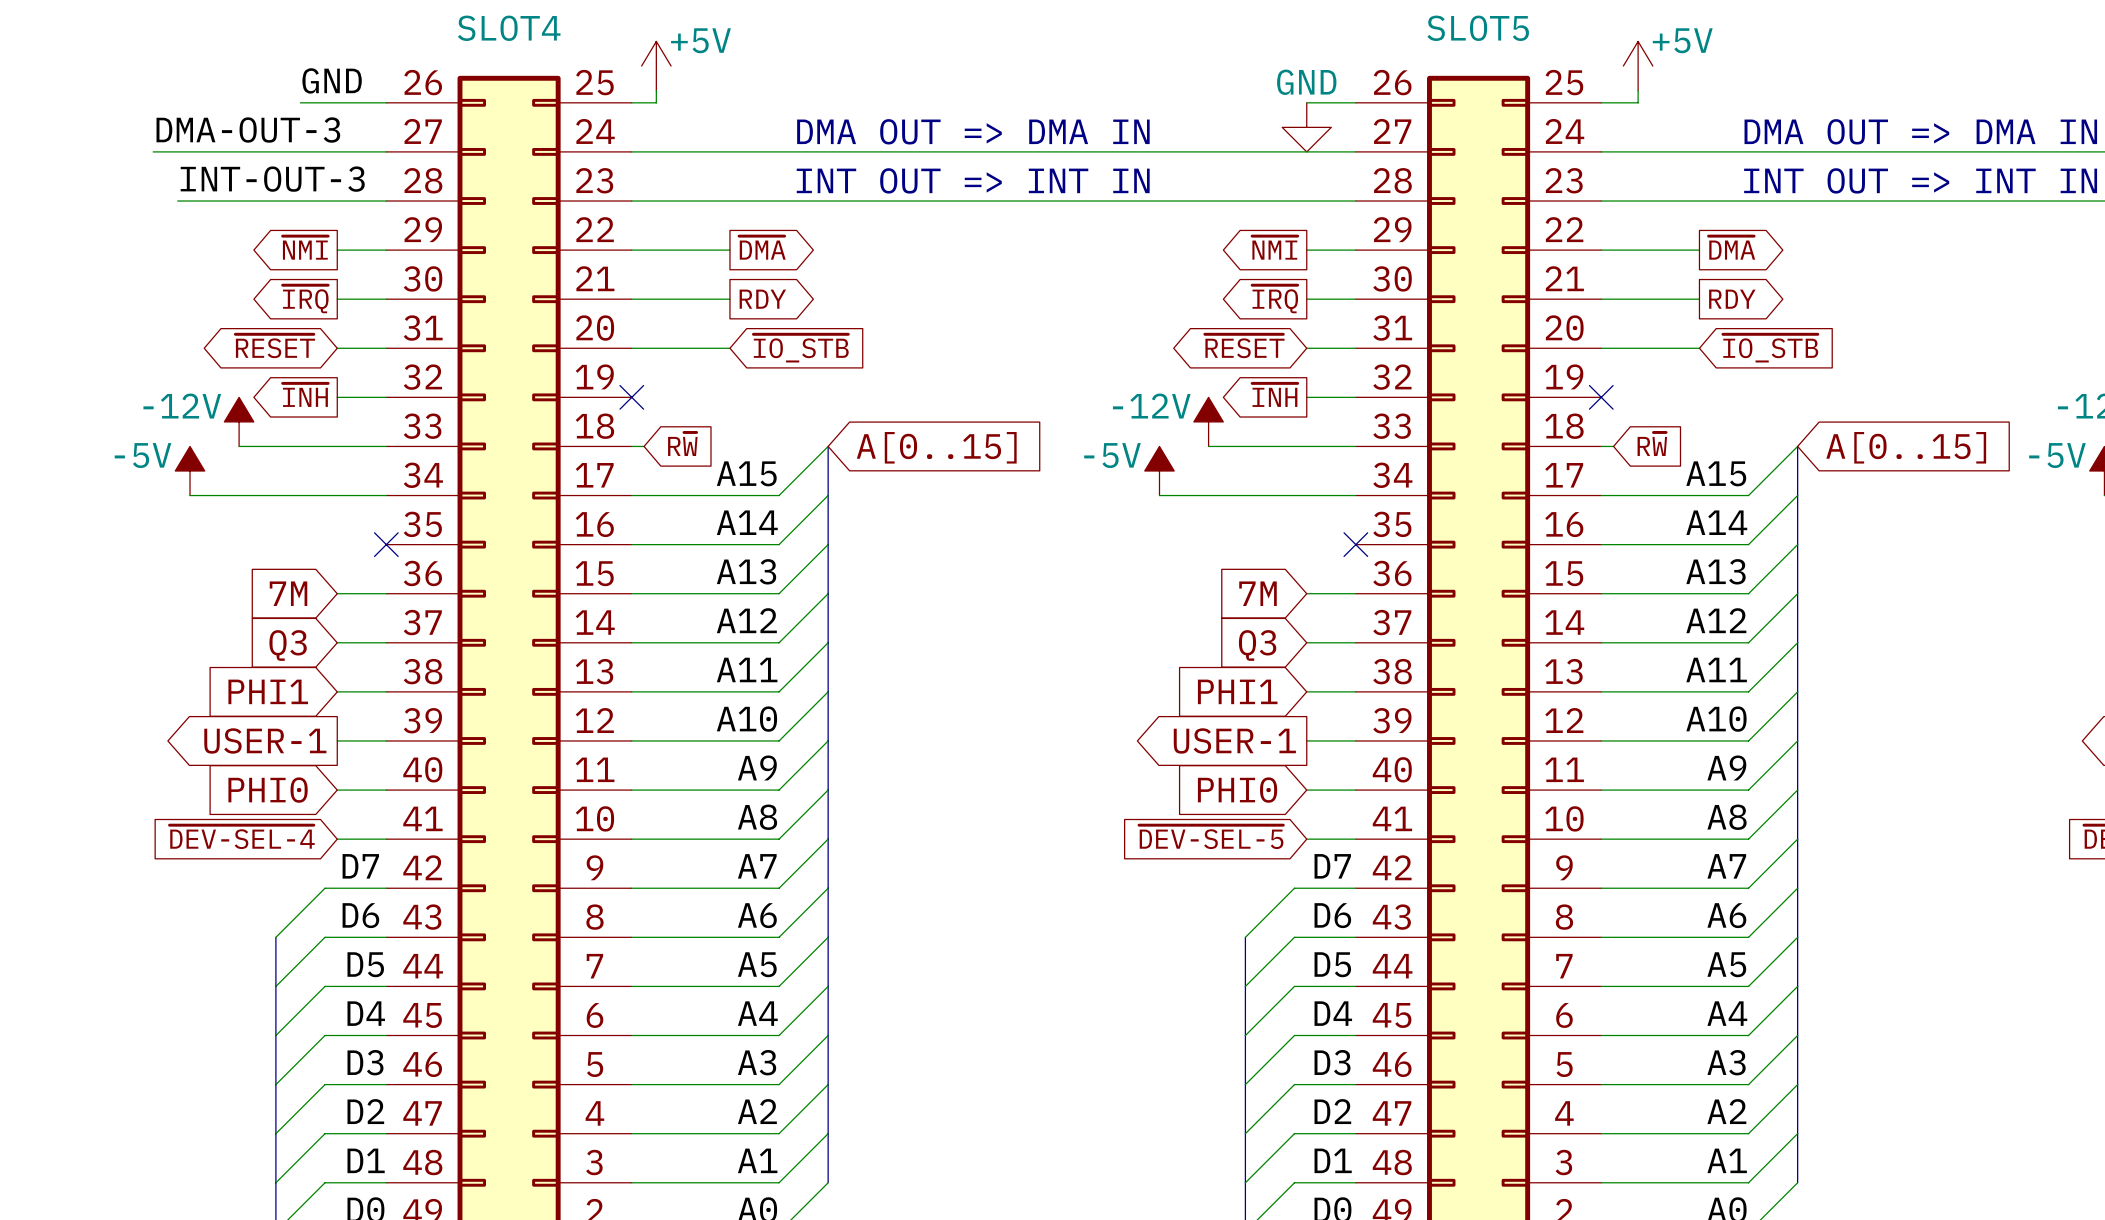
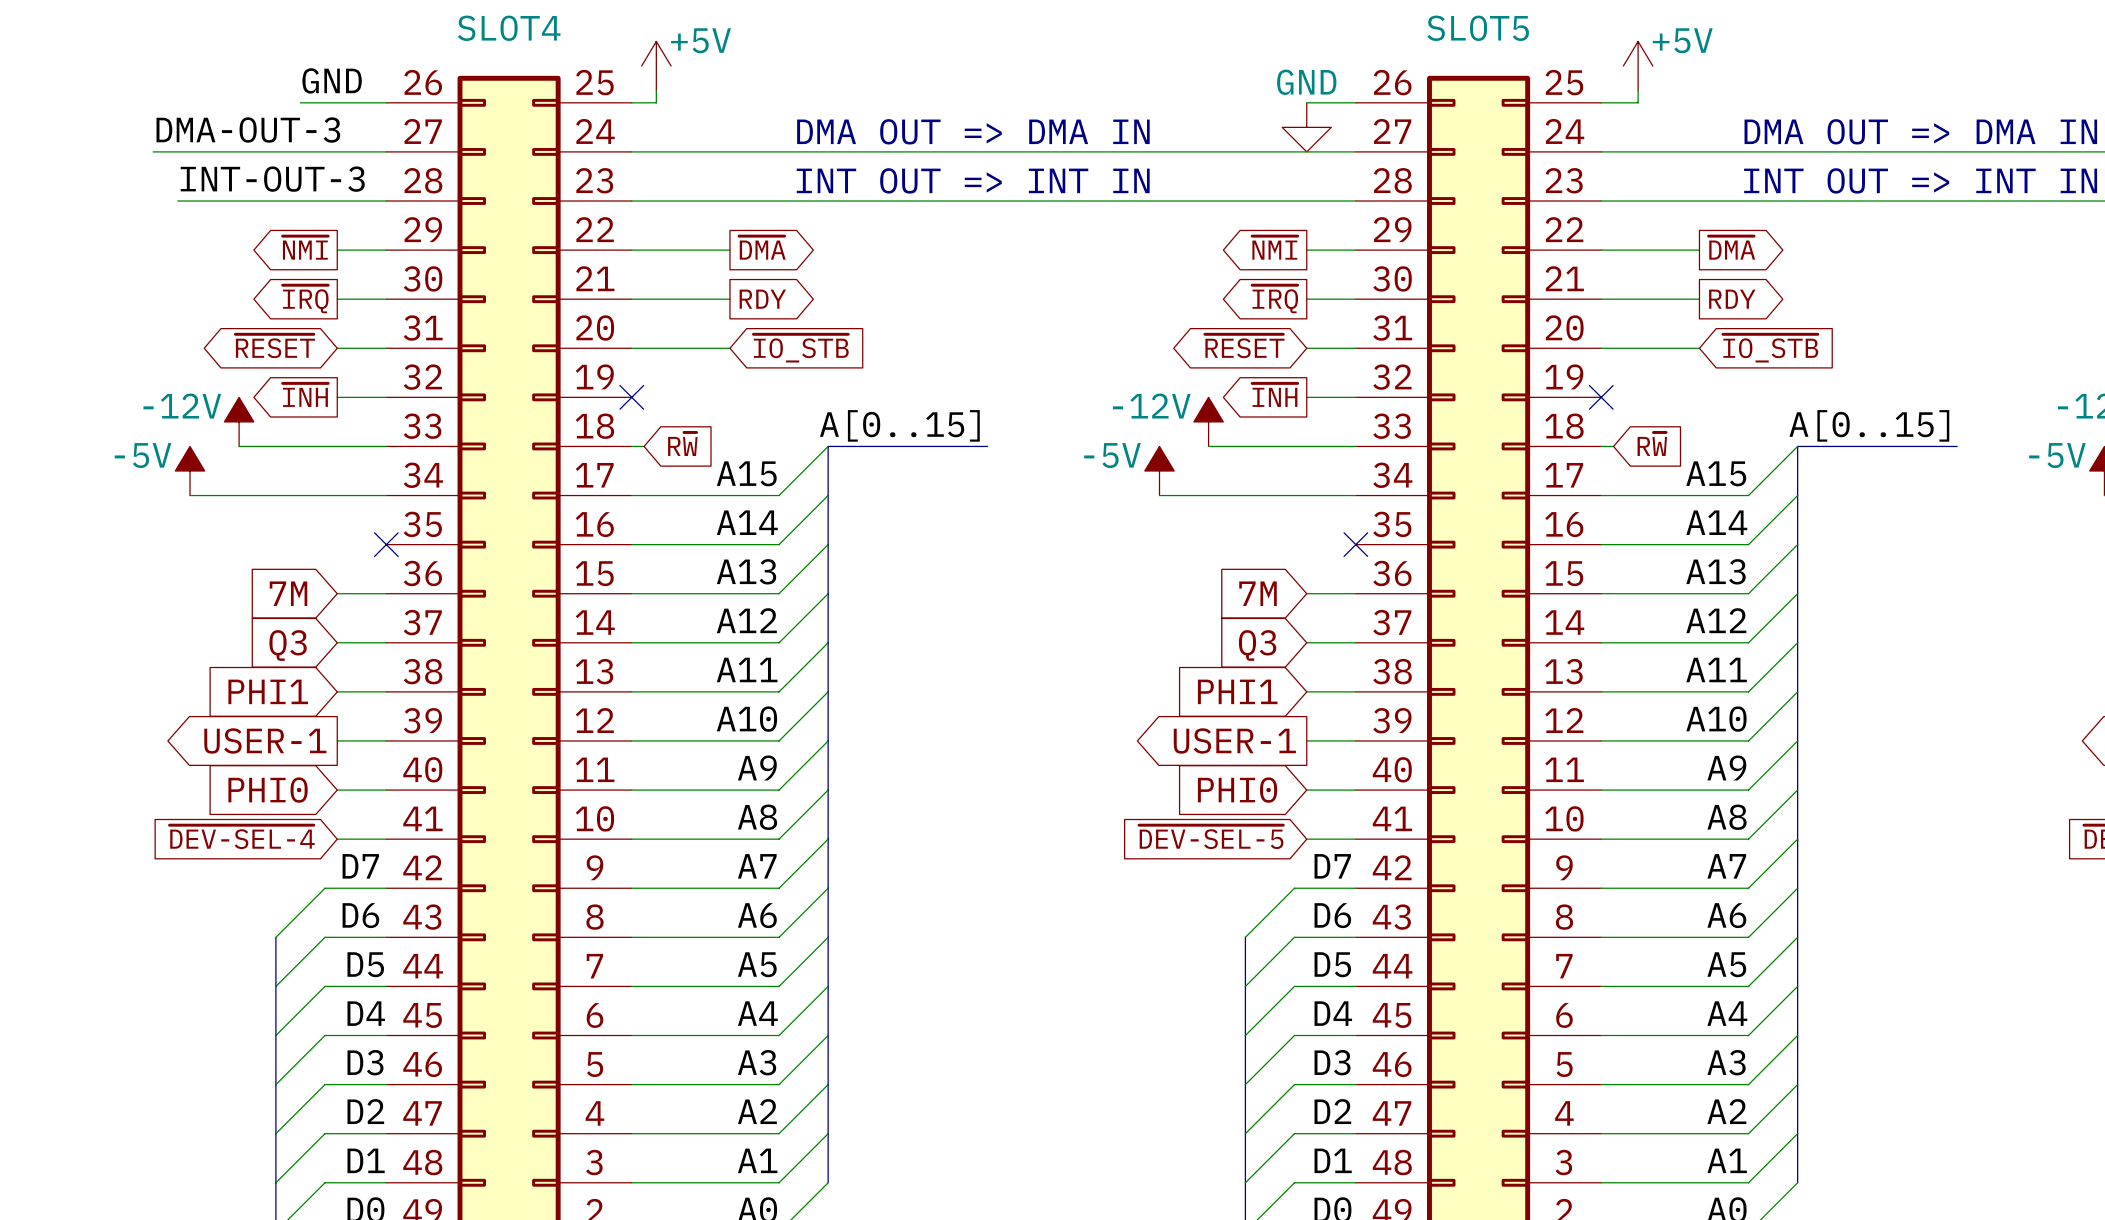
label: none -> A[0..15] (899, 425)
label: none -> A[0..15] (1869, 425)
bus: none -> (828, 446) (987, 446)
bus: none -> (1797, 446) (1957, 446)
global label: A[0..15] (936, 447) -> none
global label: A[0..15] (1906, 447) -> none

